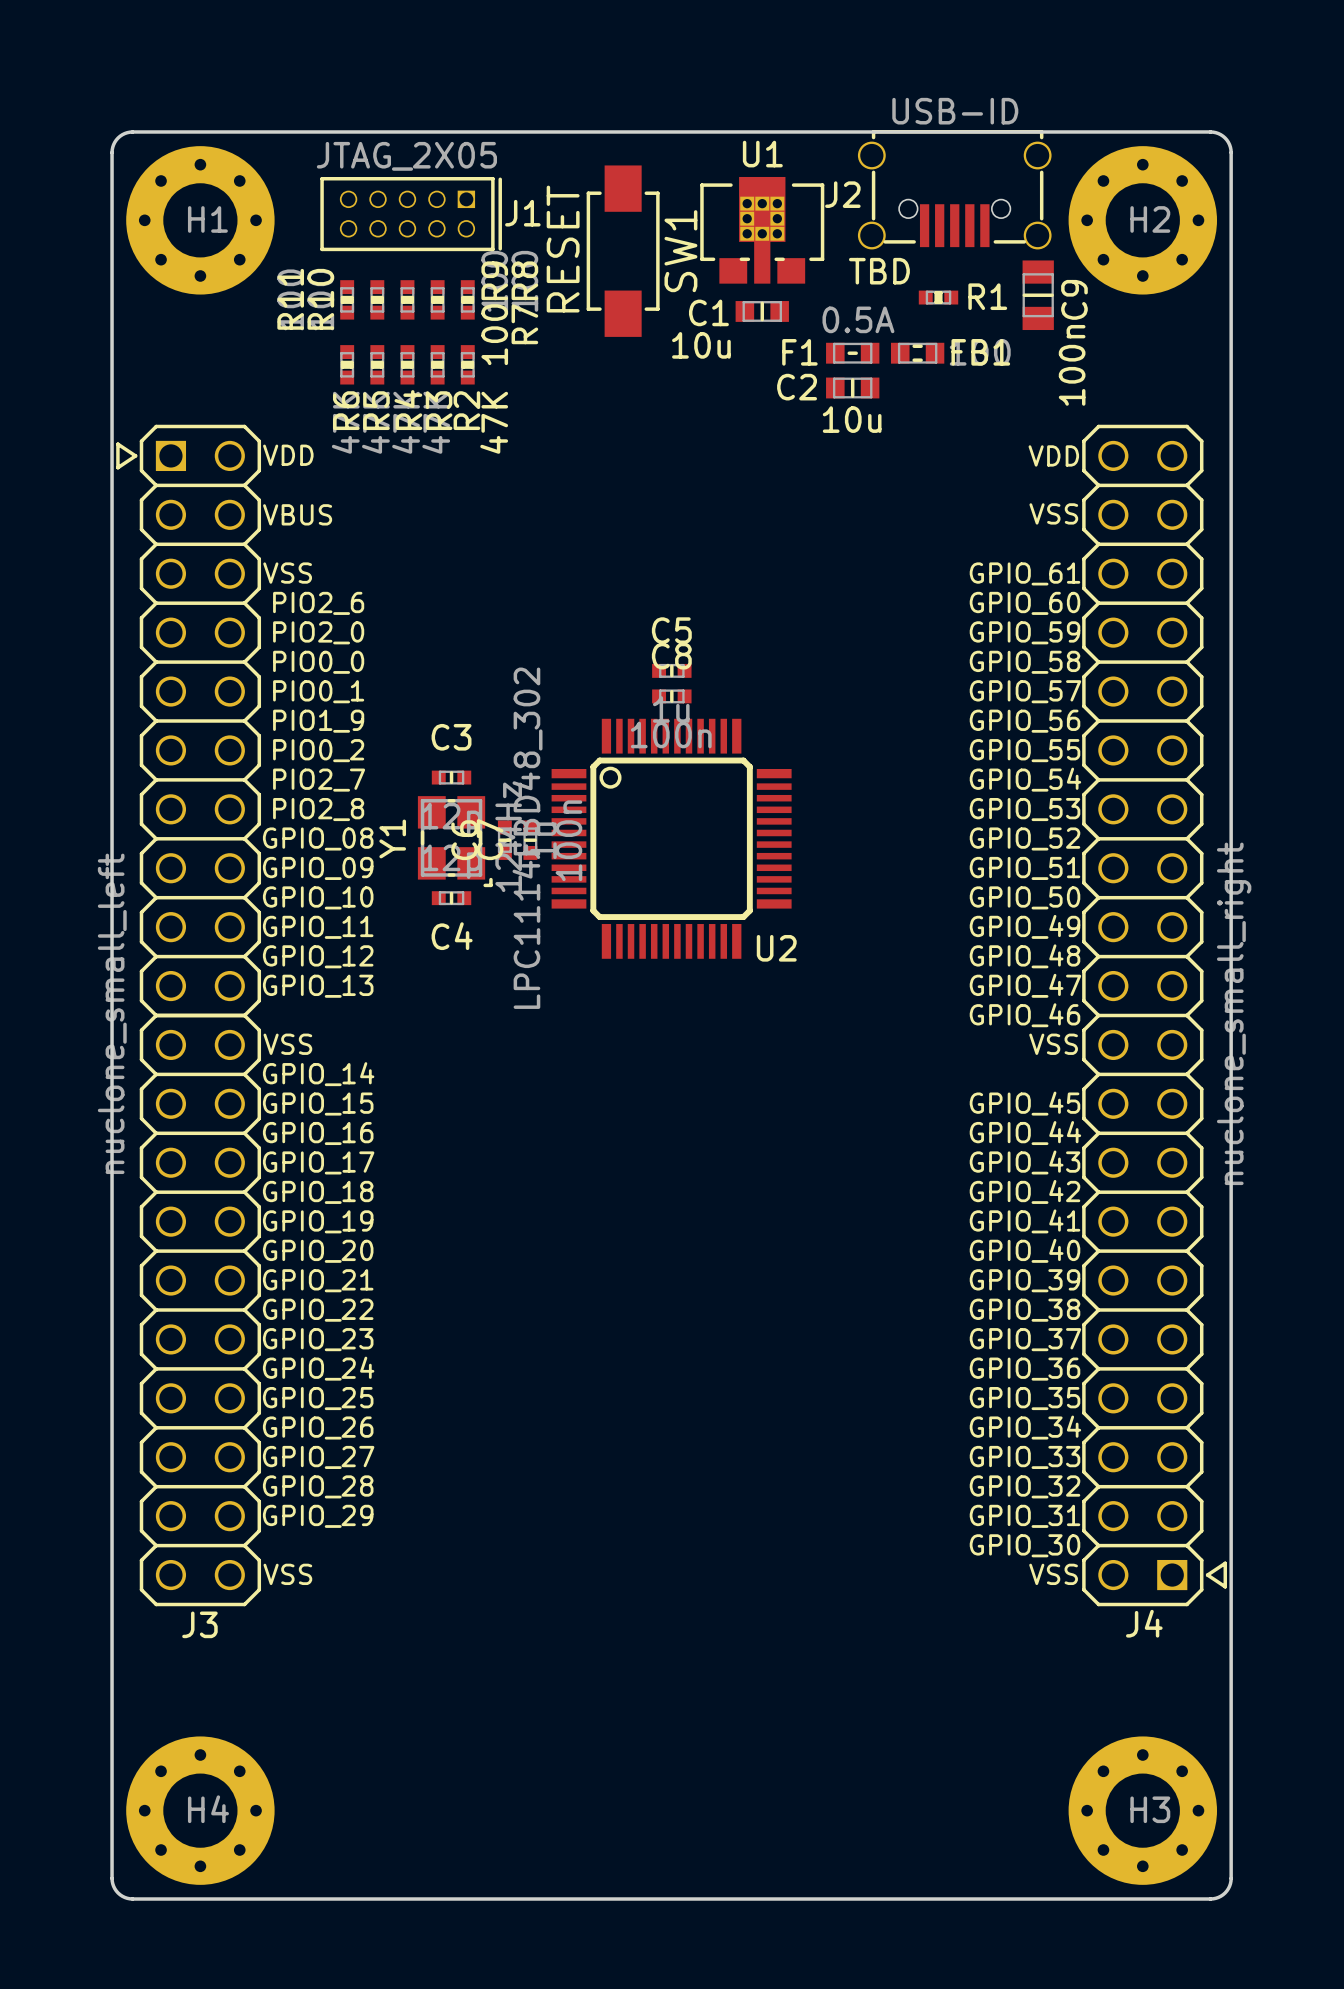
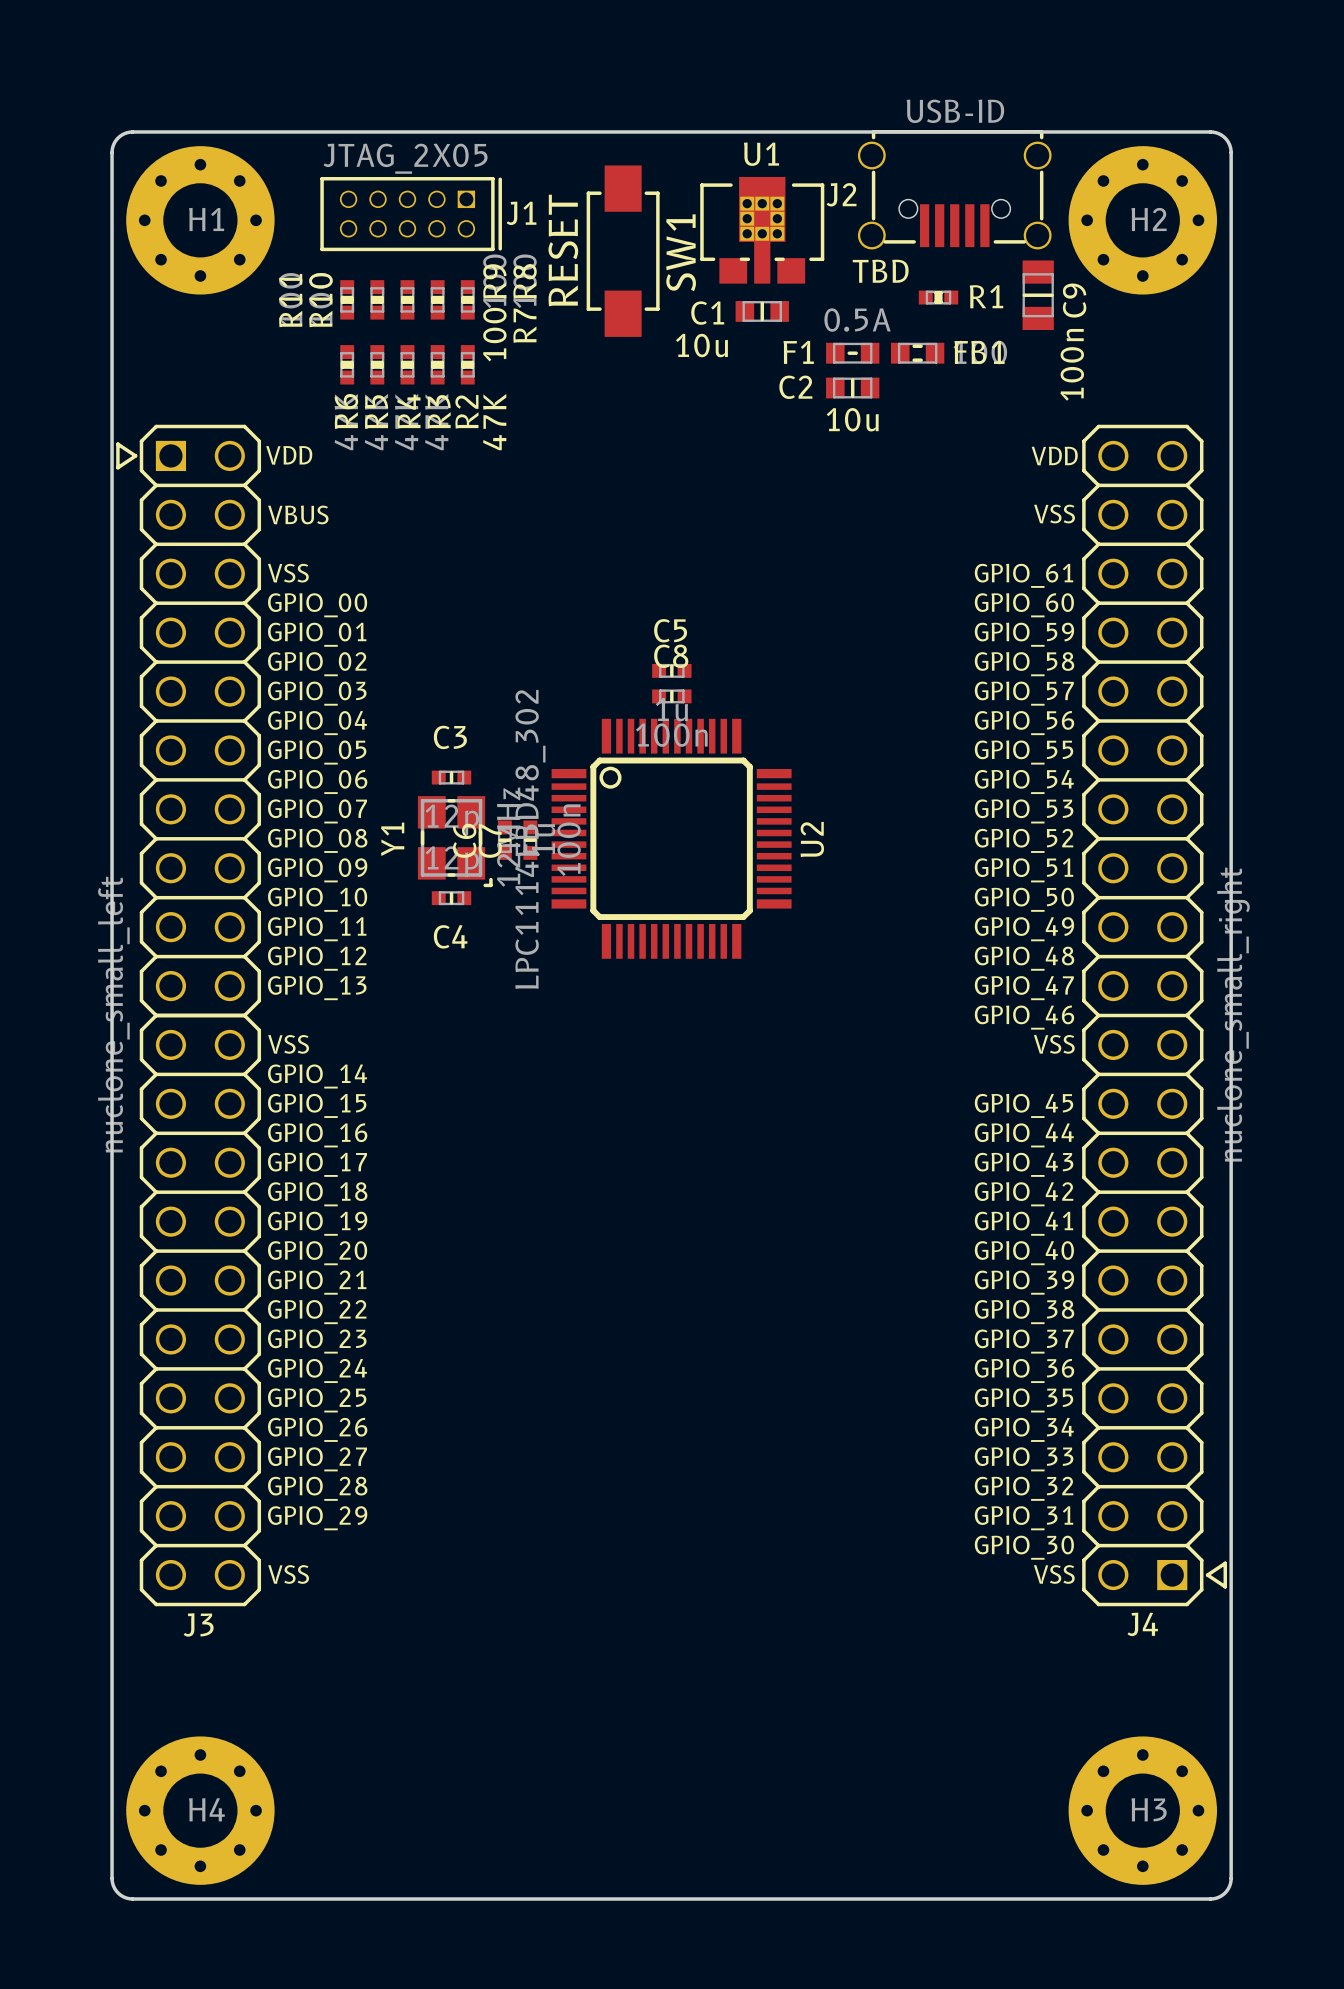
J3 text: PIO2_6 (318, 603) -> GPIO_00 (317, 605)
J3 text: PIO2_0 (318, 632) -> GPIO_01 (317, 634)
J3 text: PIO0_0 (318, 662) -> GPIO_02 (317, 664)
J3 text: PIO0_1 (318, 691) -> GPIO_03 (317, 693)
J3 text: PIO1_9 (318, 721) -> GPIO_04 (317, 723)
J3 text: PIO0_2 (318, 750) -> GPIO_05 (317, 752)
J3 text: PIO2_7 (319, 780) -> GPIO_06 (317, 781)
J3 text: PIO2_8 (318, 809) -> GPIO_07 (317, 811)
U2 name rotation: 0° (776, 948) -> 90° counterclockwise (812, 839)
U2 name position: U2 (776, 948) -> U2 (812, 839)

